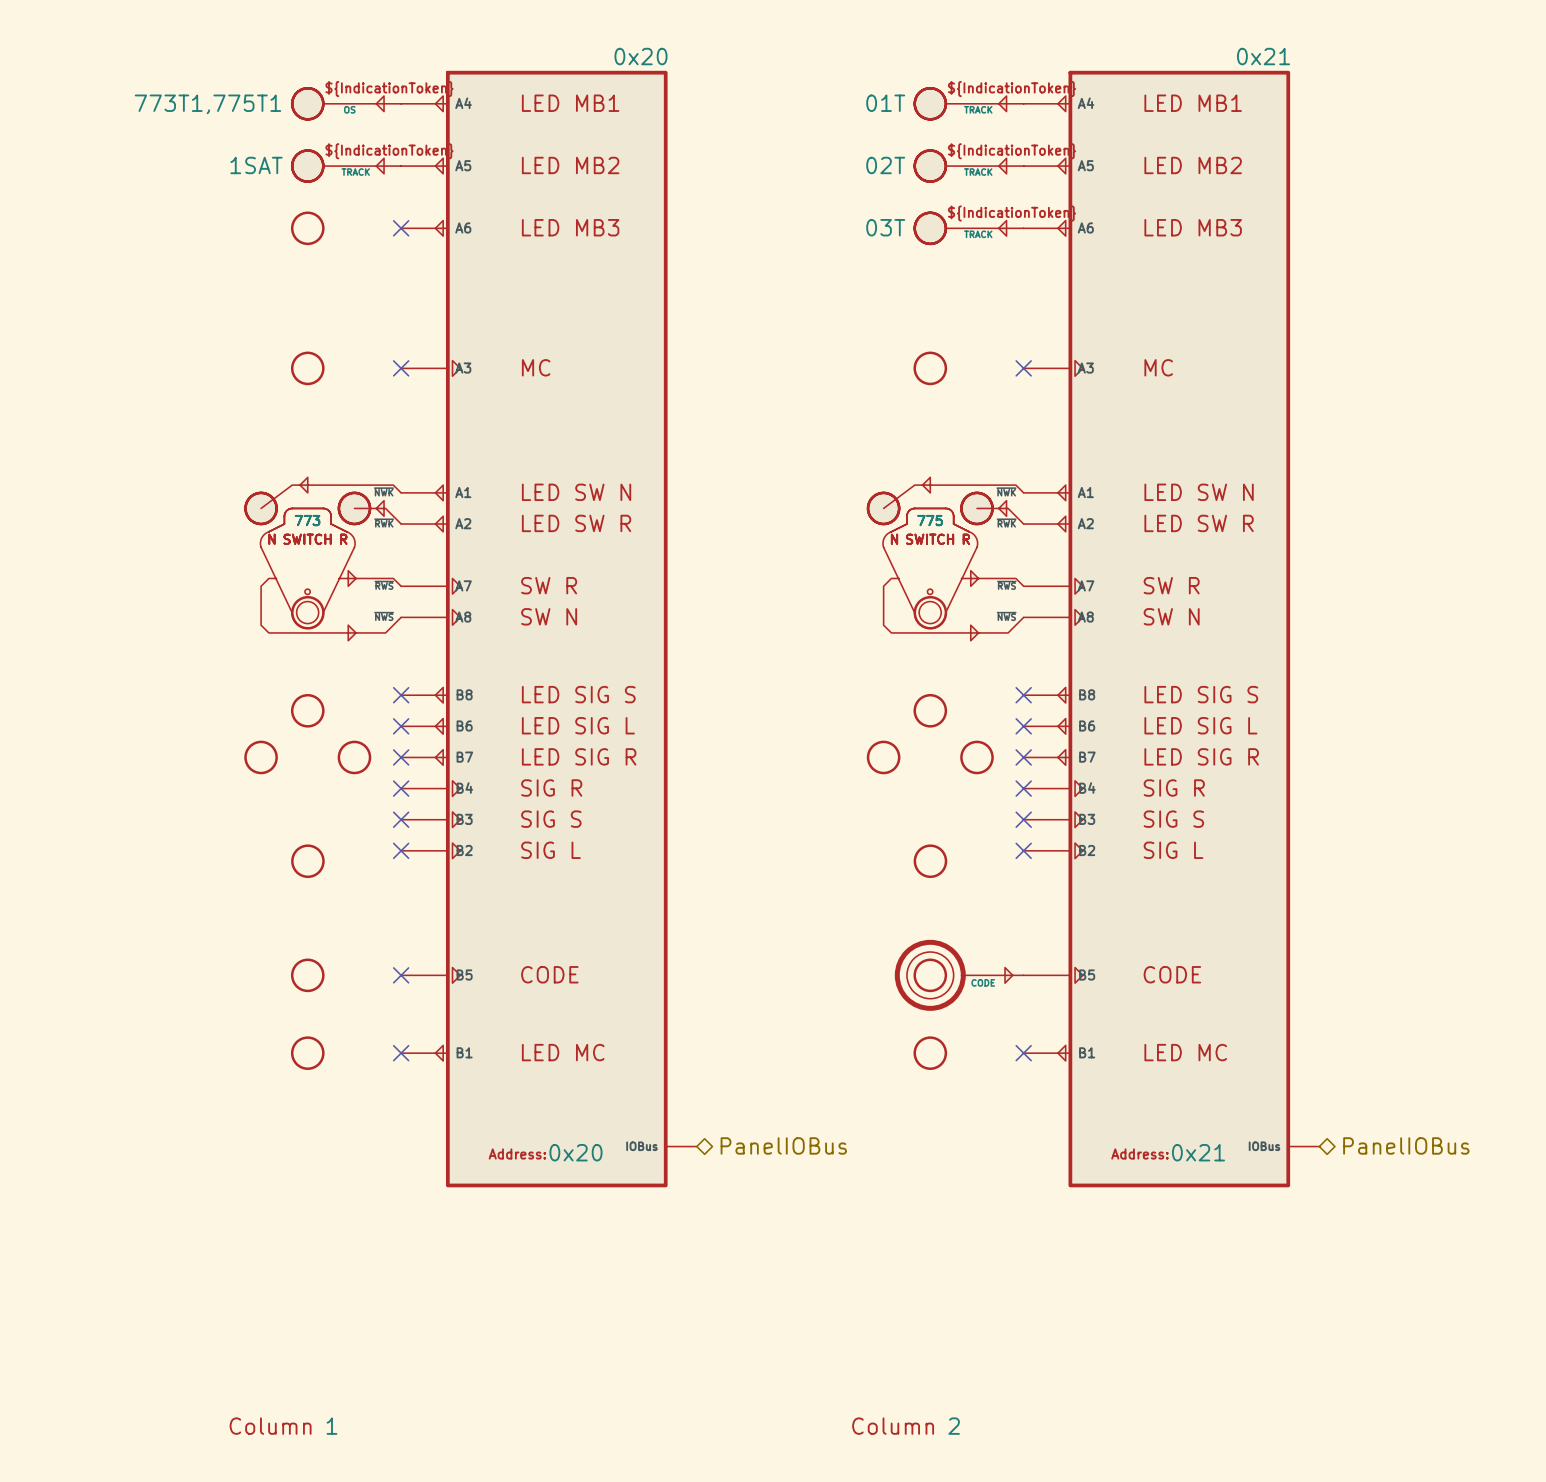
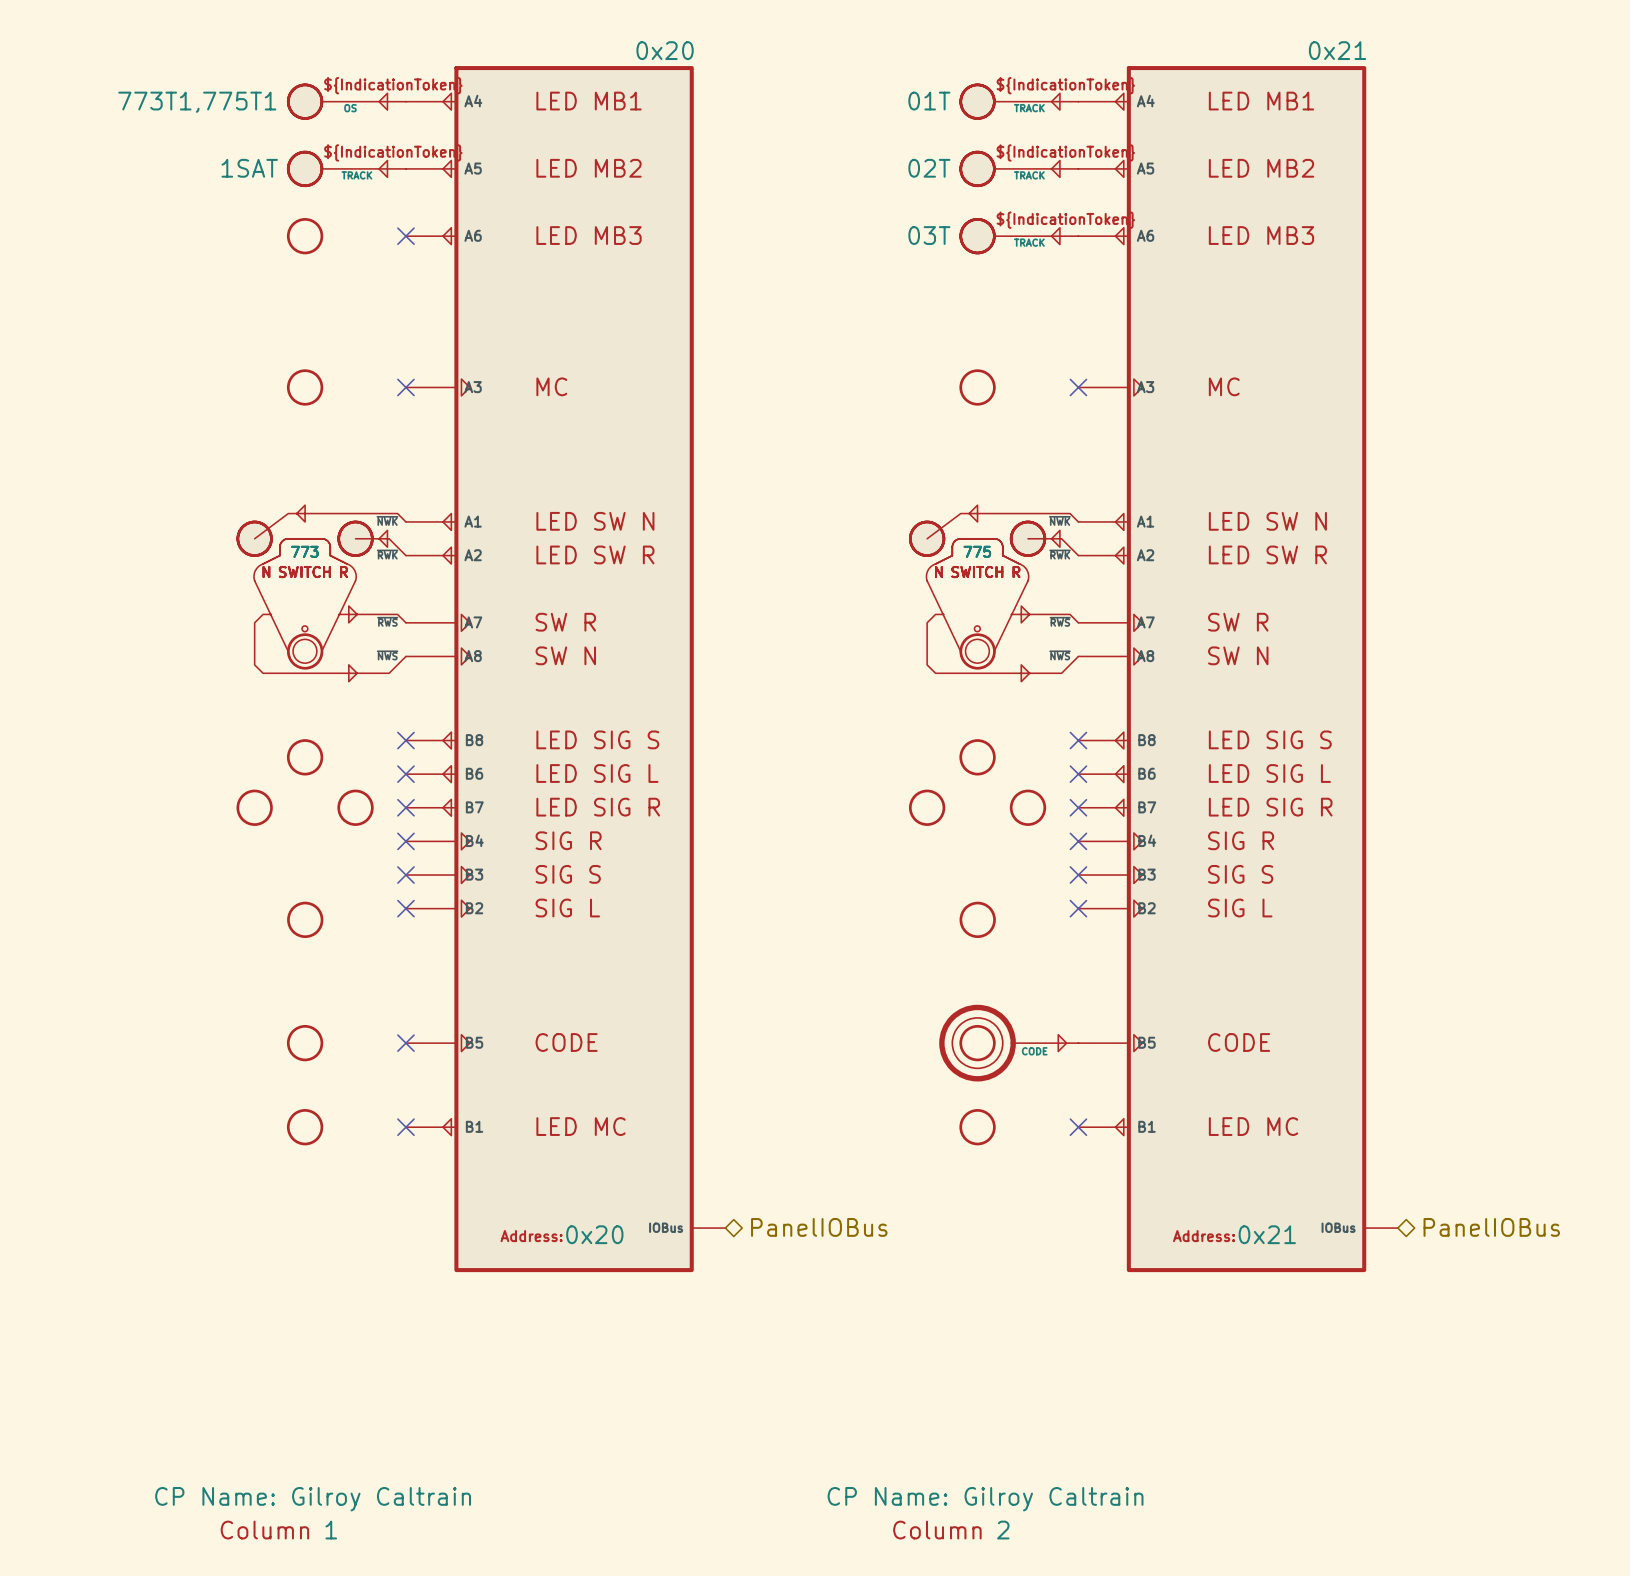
part text: none -> CP Name: Gilroy Caltrain (313, 1499)
part text: none -> CP Name: Gilroy Caltrain (985, 1499)

